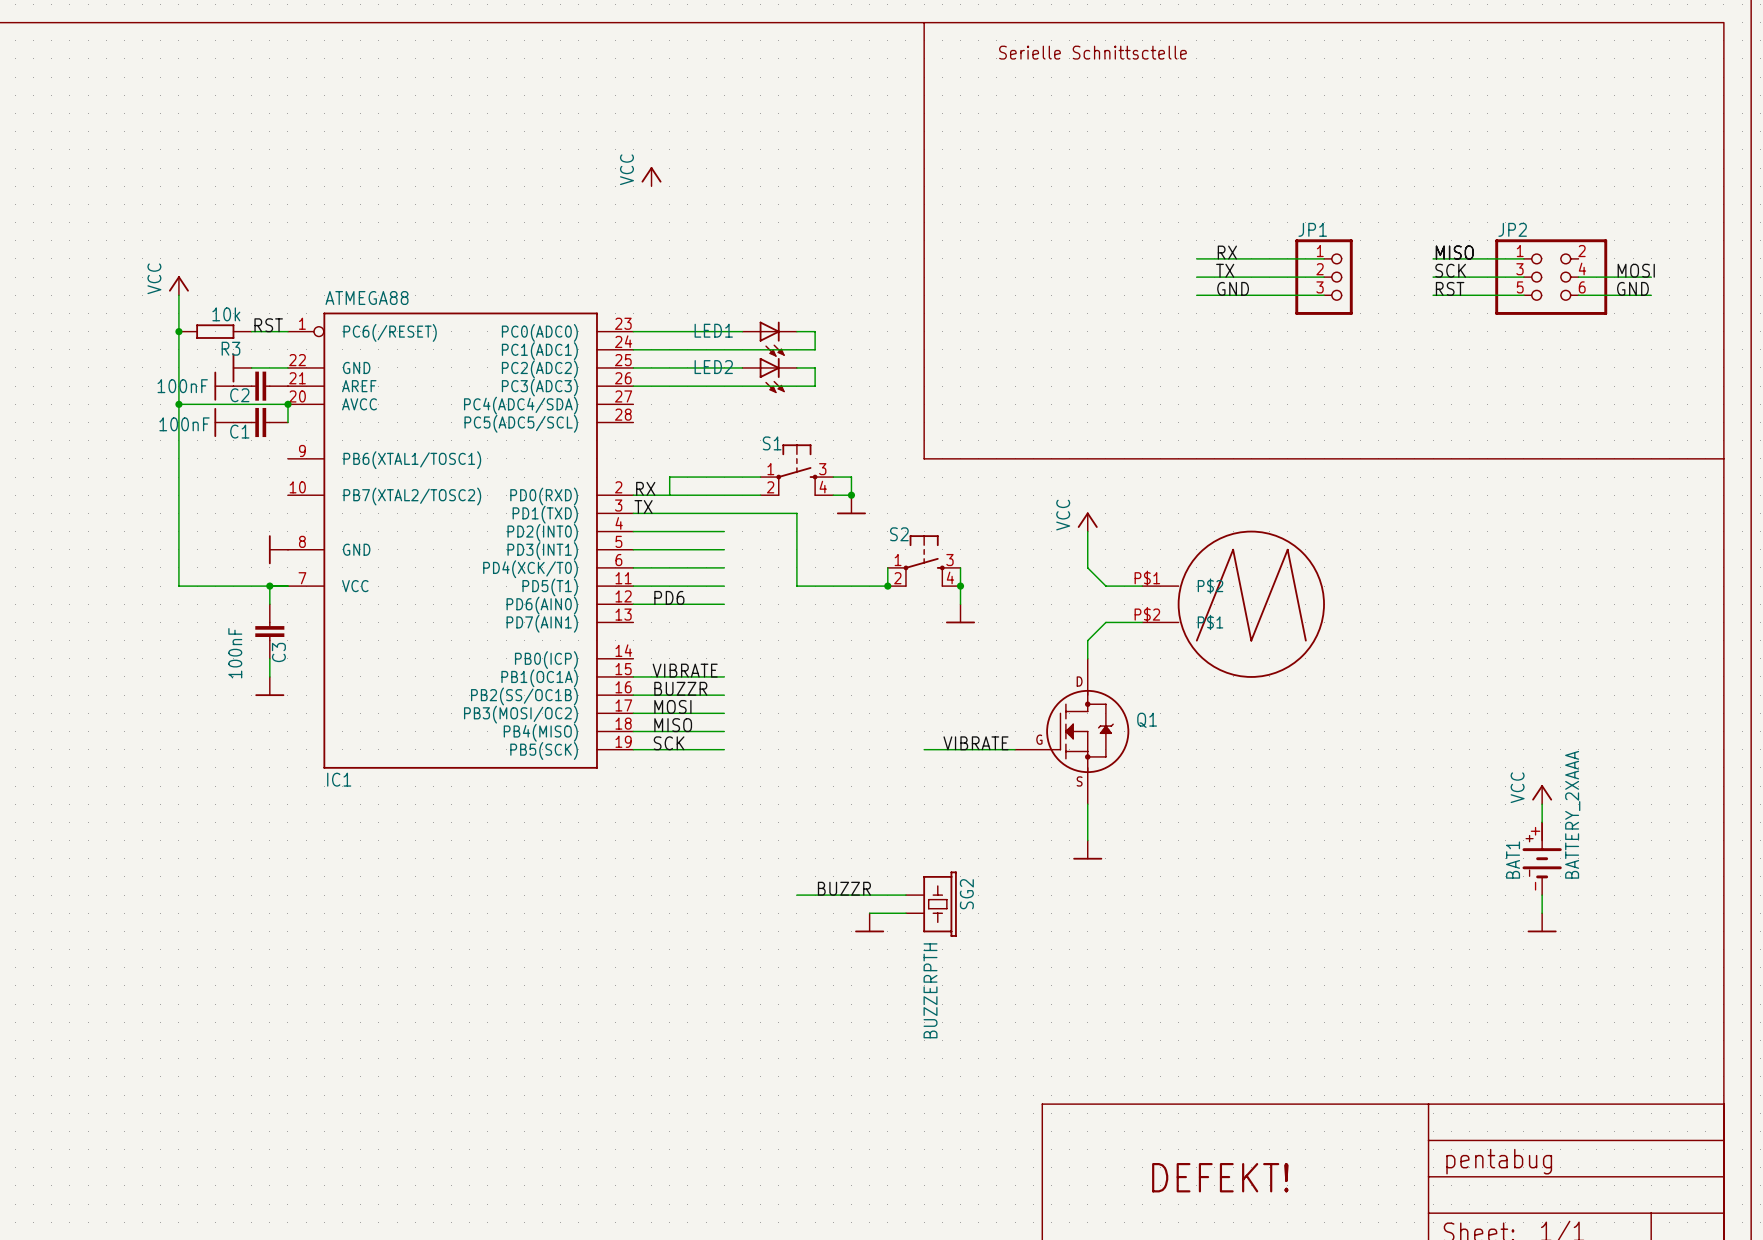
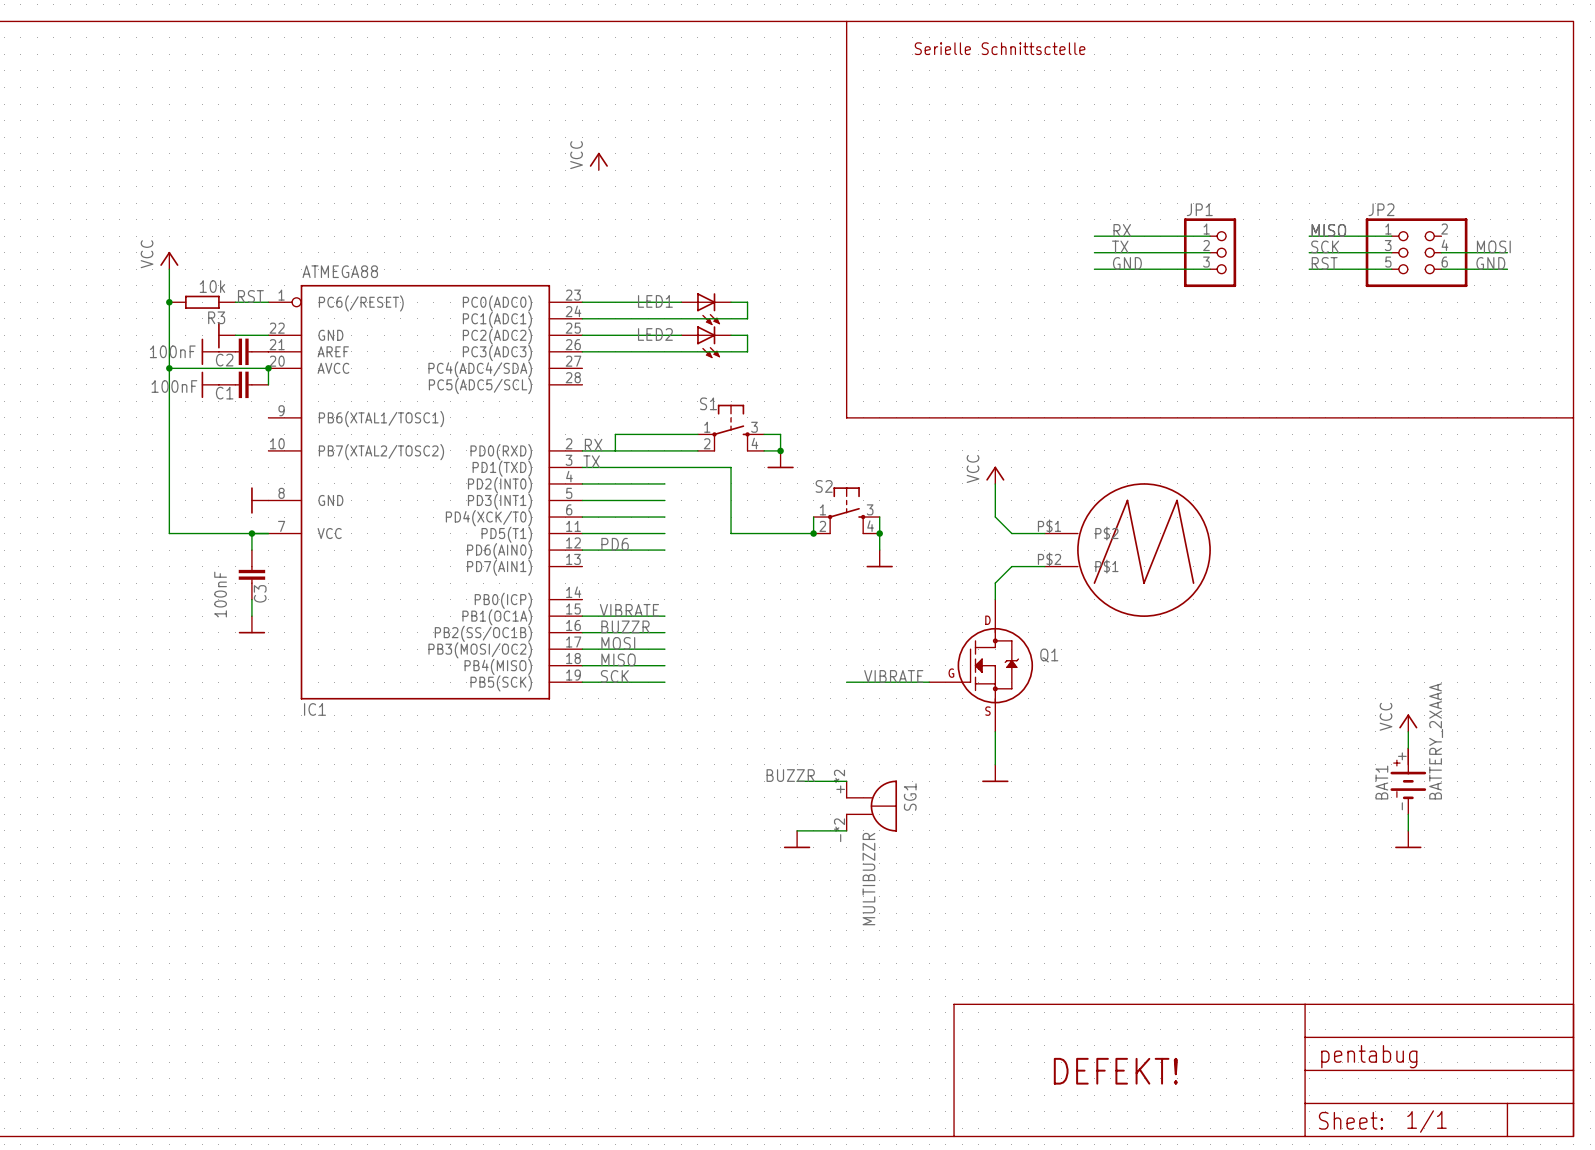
wire: none -> (797, 781) (846, 781)
SG1: none -> MULTIBUZZR (871, 806)
label position: BUZZR (844, 888) -> BUZZR (790, 775)
wire: (796, 895) (905, 895) -> none
SG2: BUZZERPTH (931, 904) -> none

